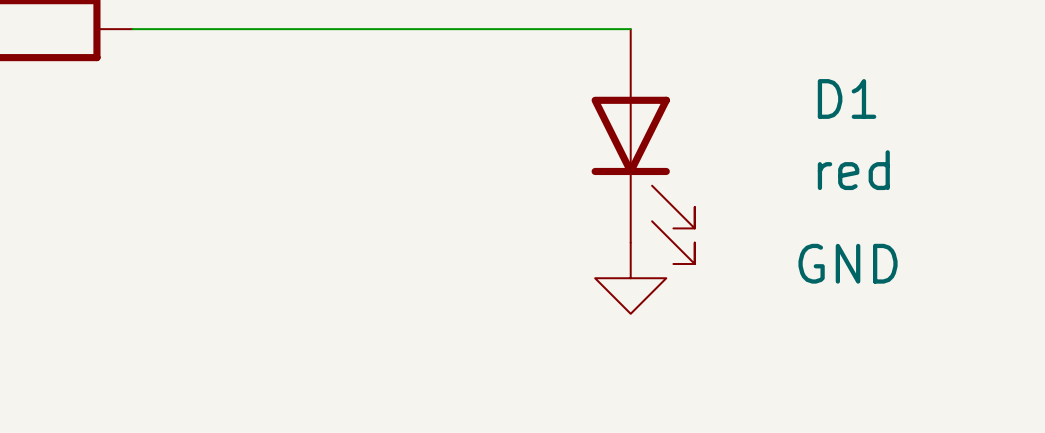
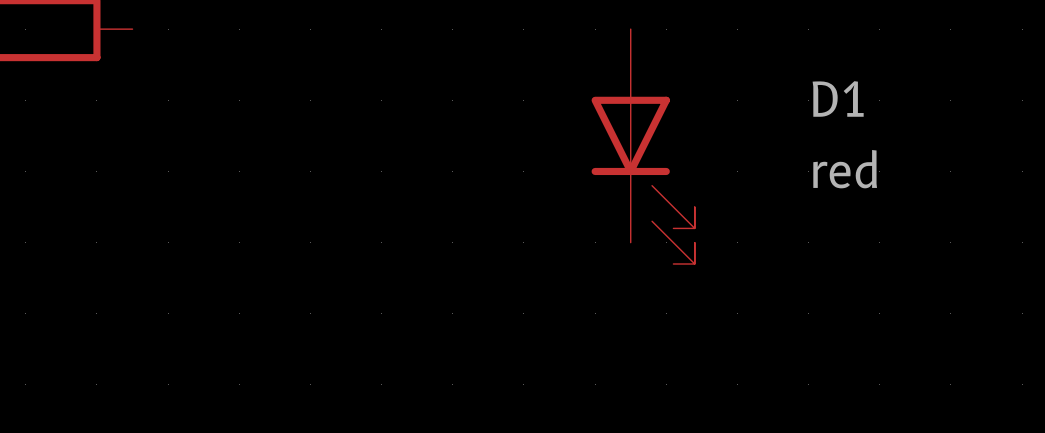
wire: (132, 29) (630, 29) -> none
power symbol: GND (630, 278) -> none

